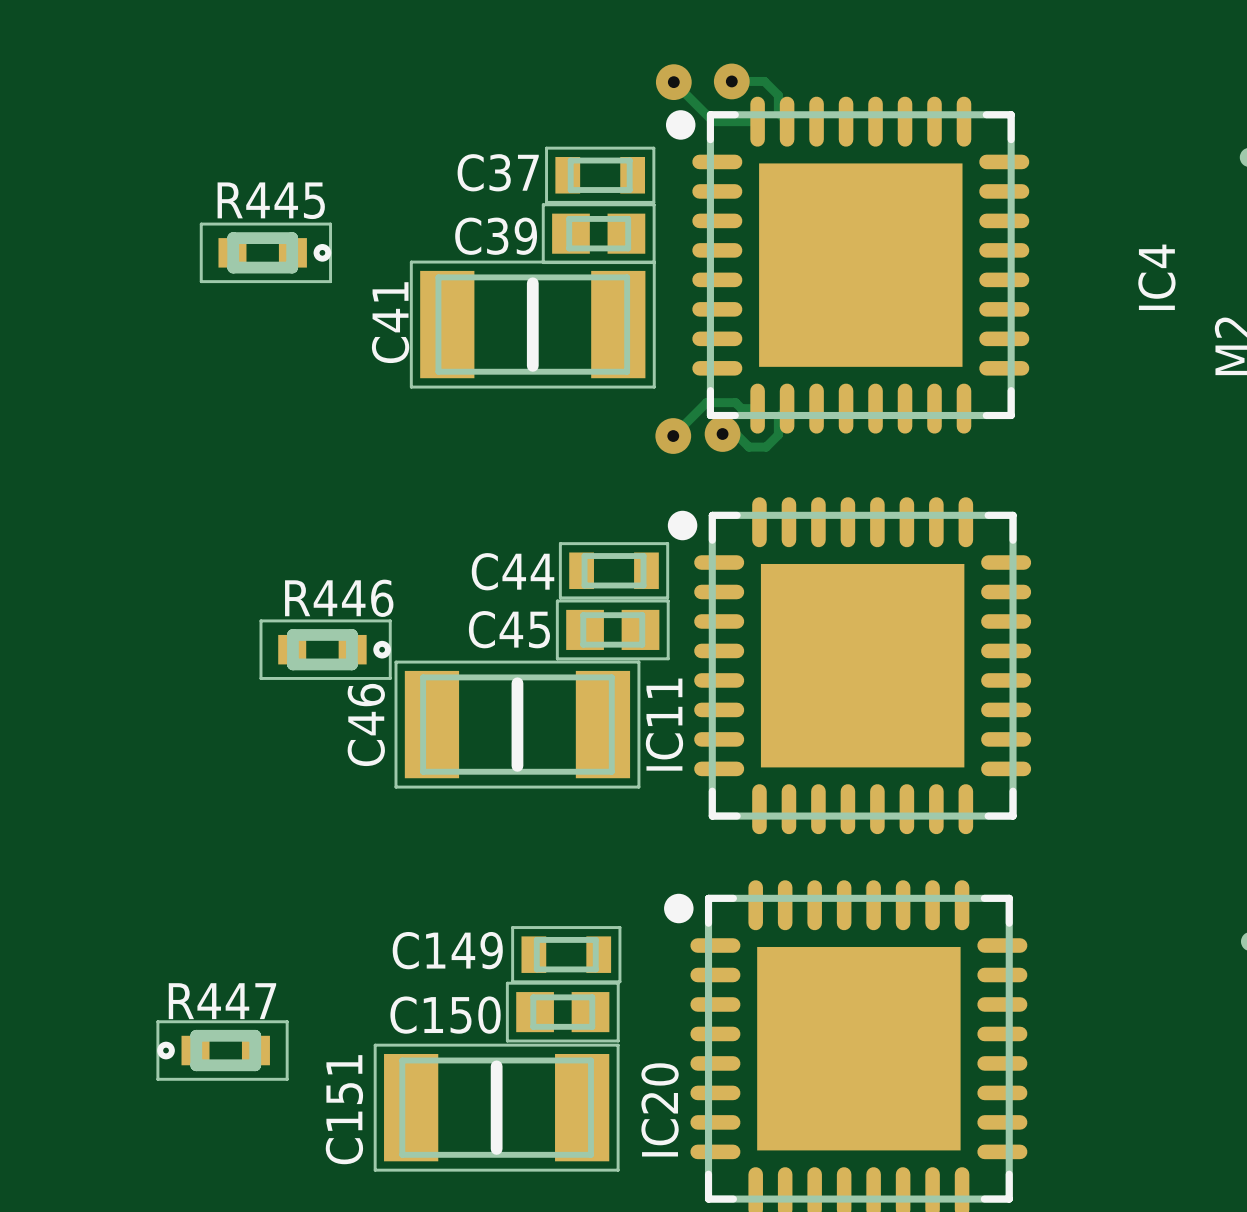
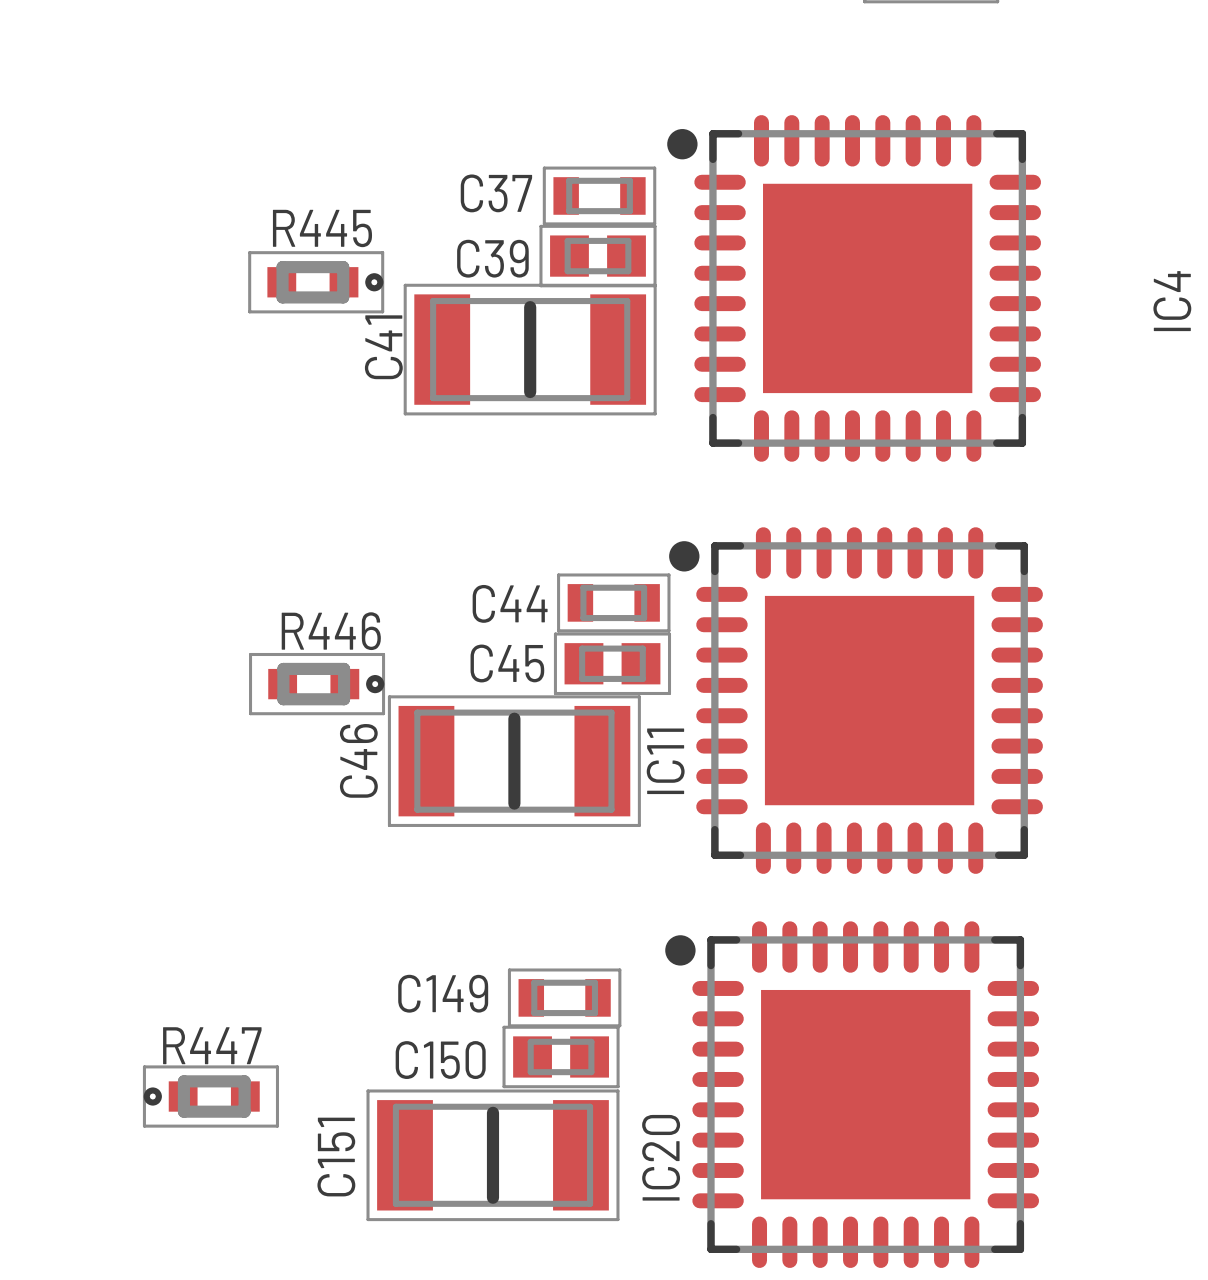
track: (731, 81) (764, 81) (778, 95) (778, 112) (787, 121) -> none
via: (731, 81) -> none
track: (673, 82) (713, 121) (757, 121) -> none
via: (673, 82) -> none
R445 position: (265, 252) -> (316, 282)
track: (757, 408) (741, 408) (735, 402) (706, 402) (673, 436) -> none
track: (787, 408) (778, 417) (778, 434) (766, 447) (749, 447) (735, 434) (722, 434) -> none
via: (722, 434) -> none
via: (673, 436) -> none

